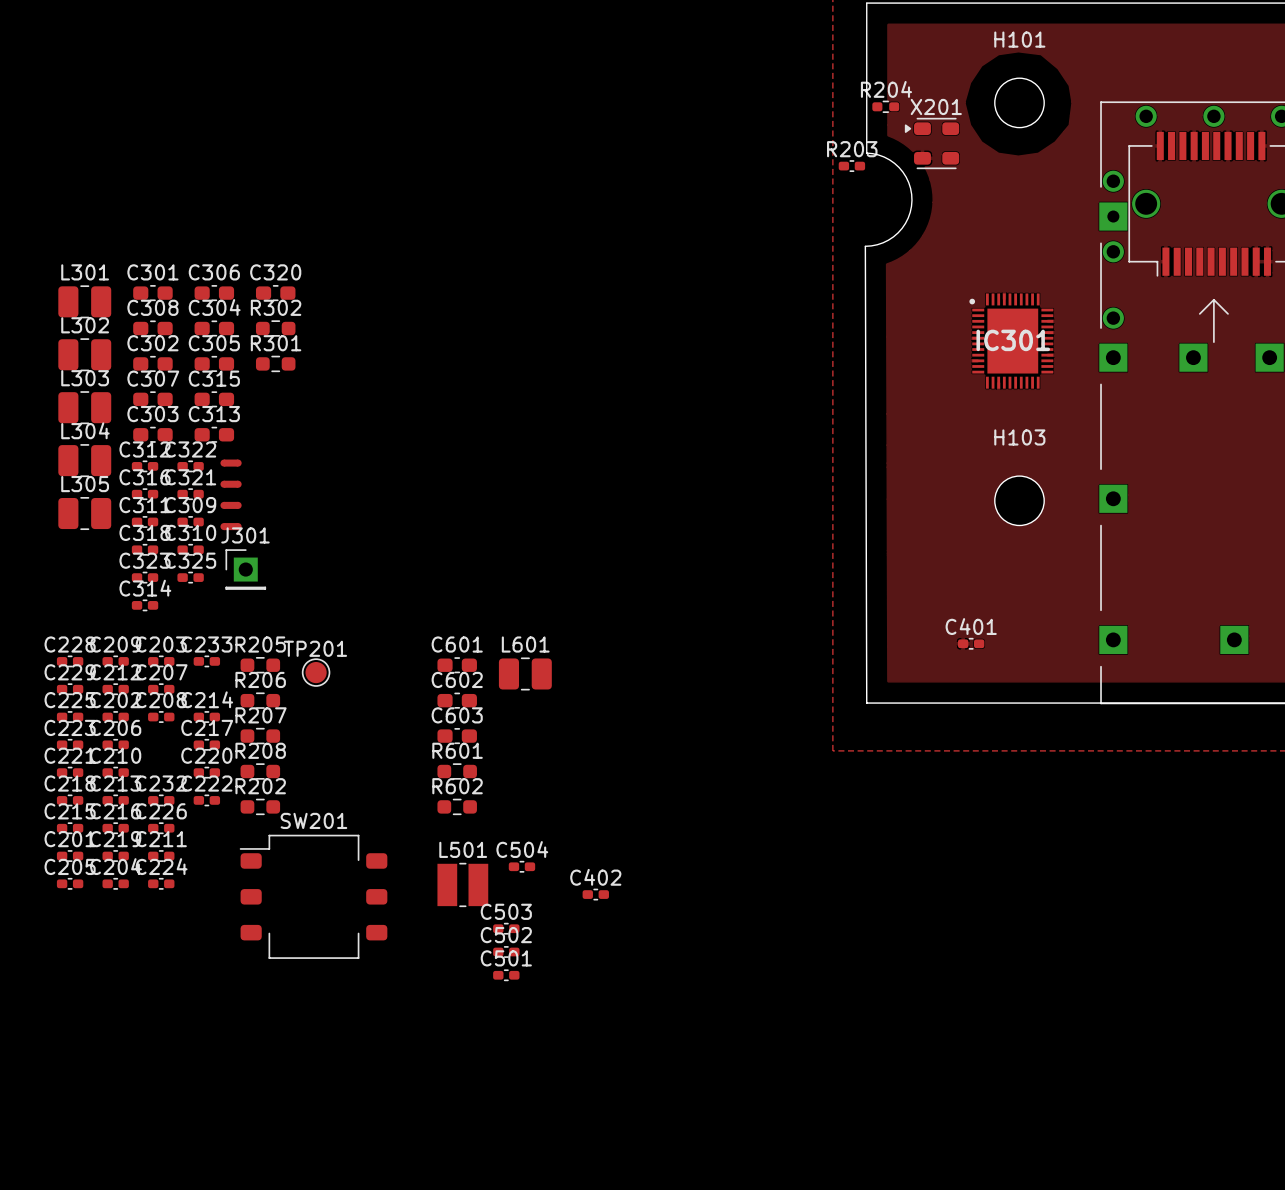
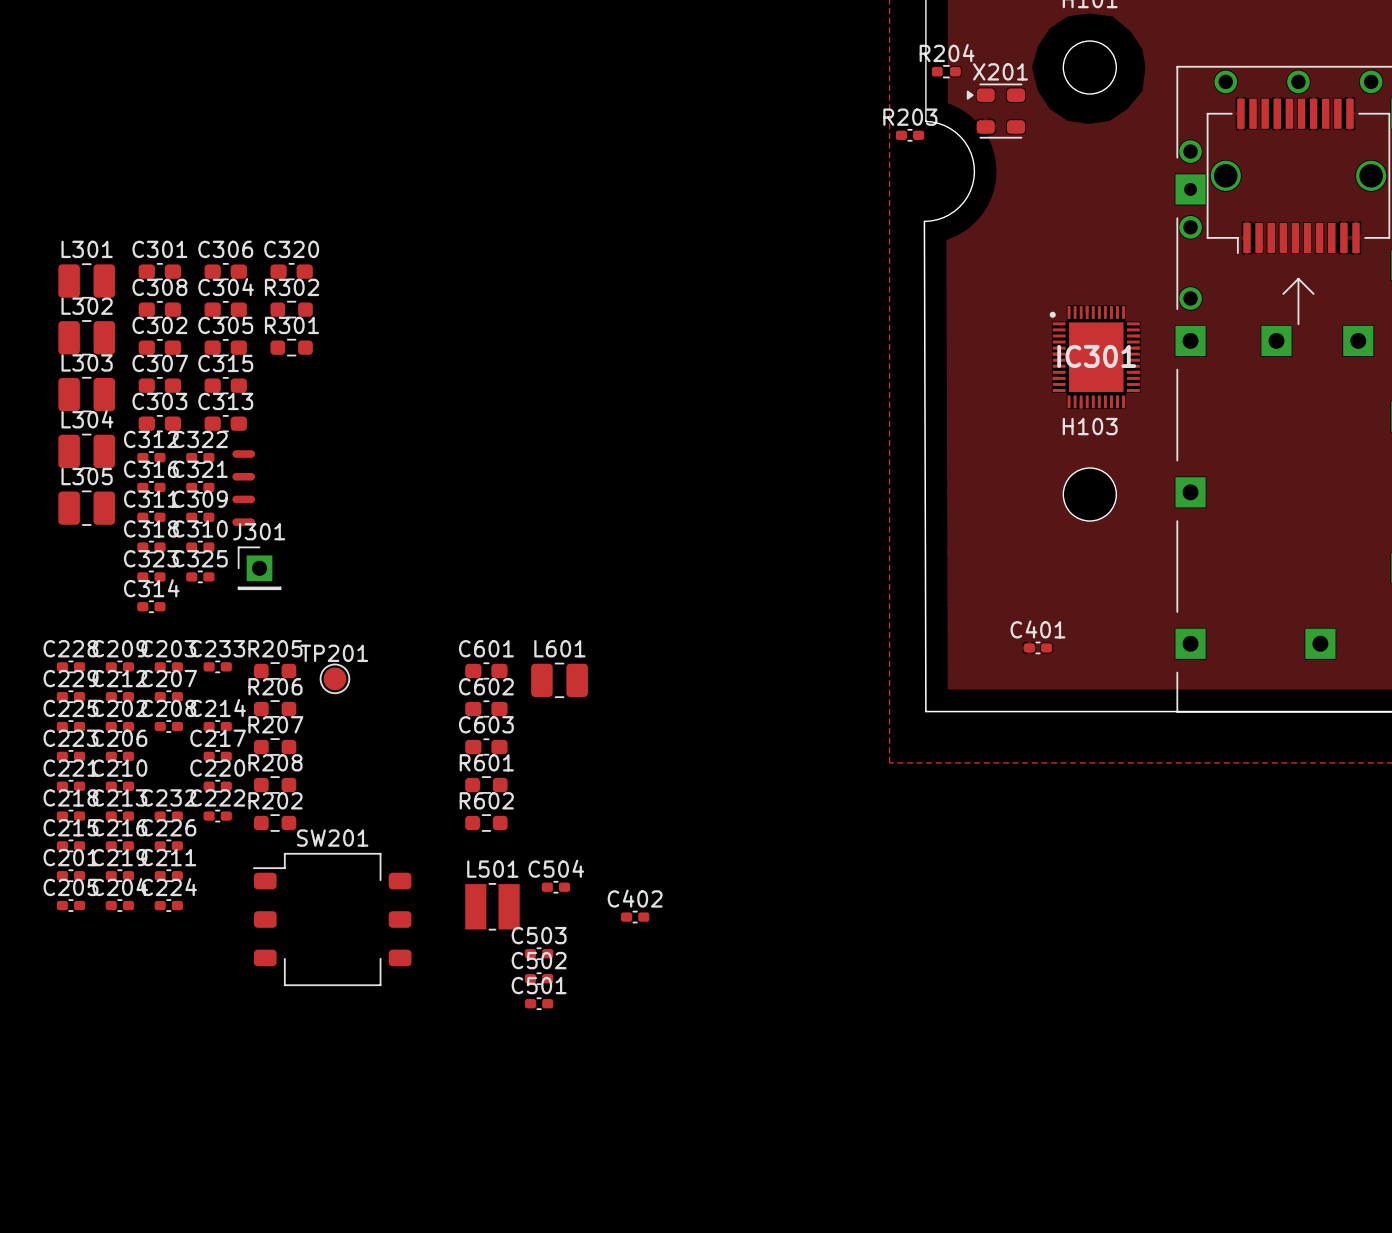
IC301 position: (1011, 341) -> (1094, 357)

